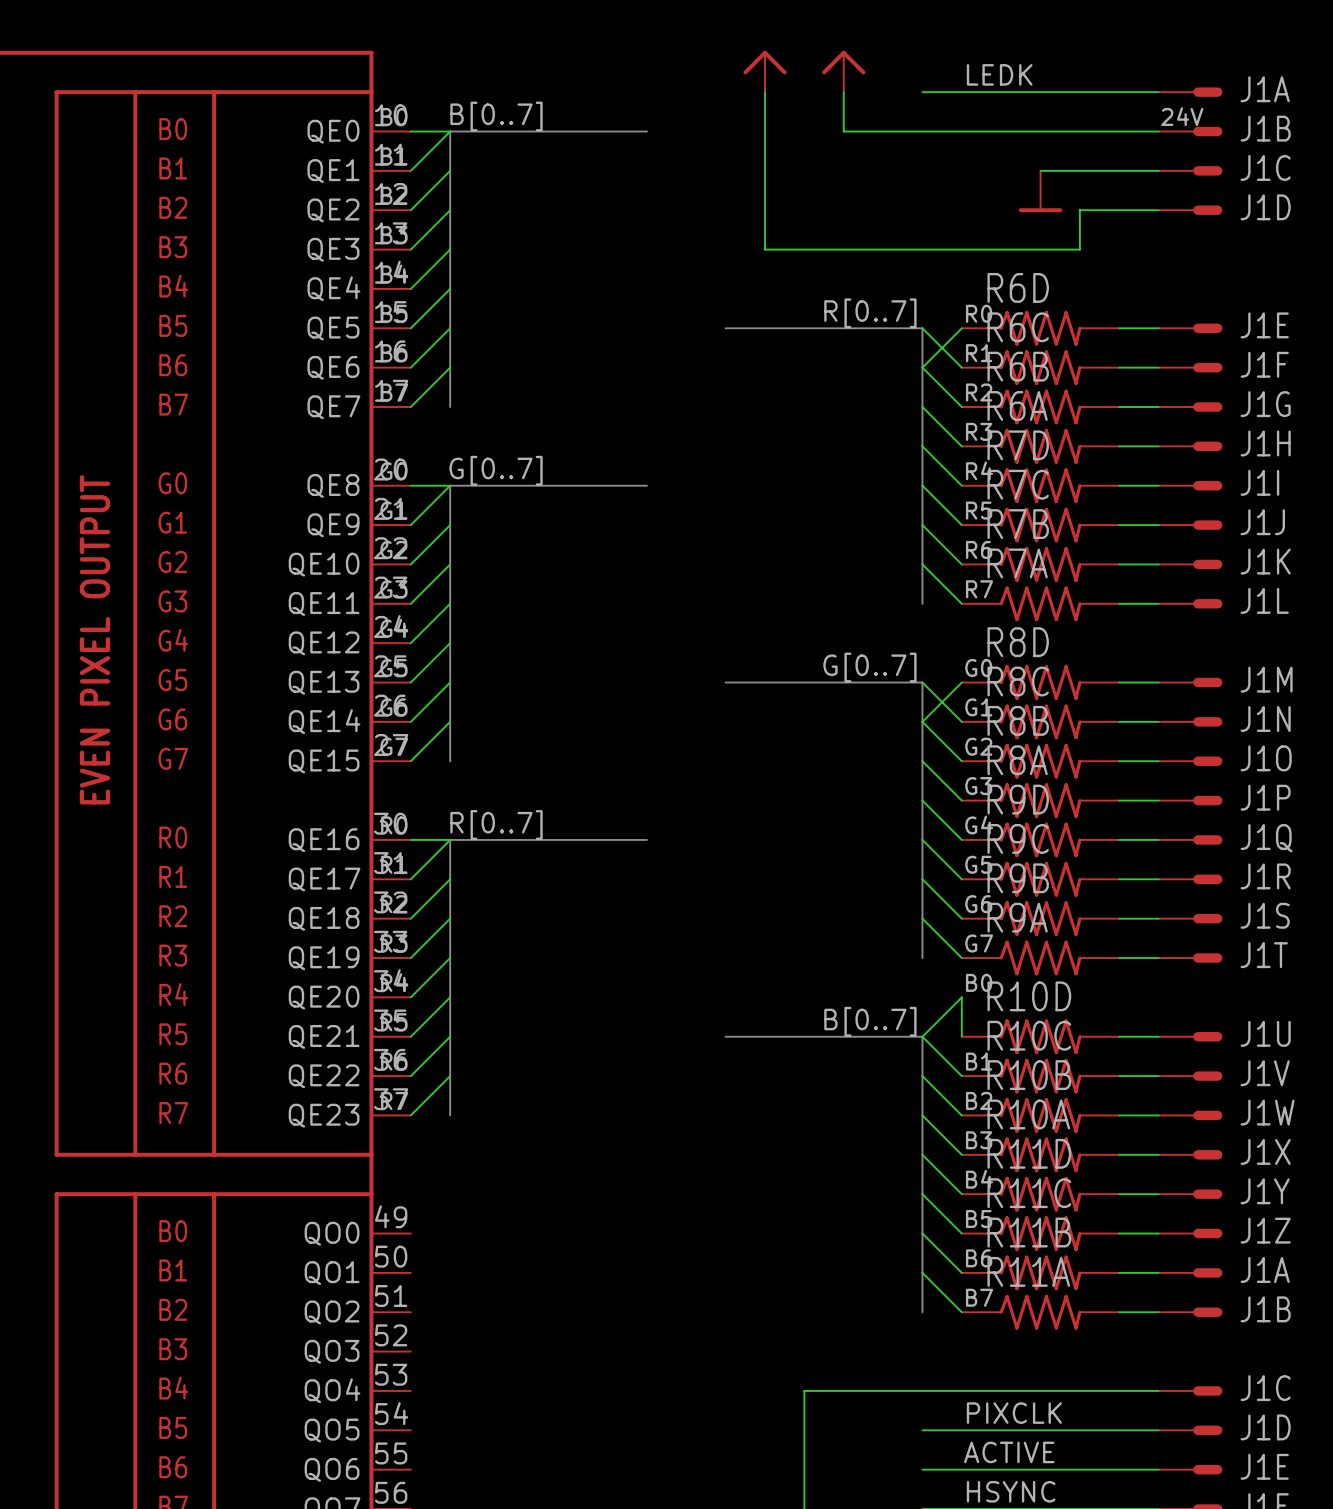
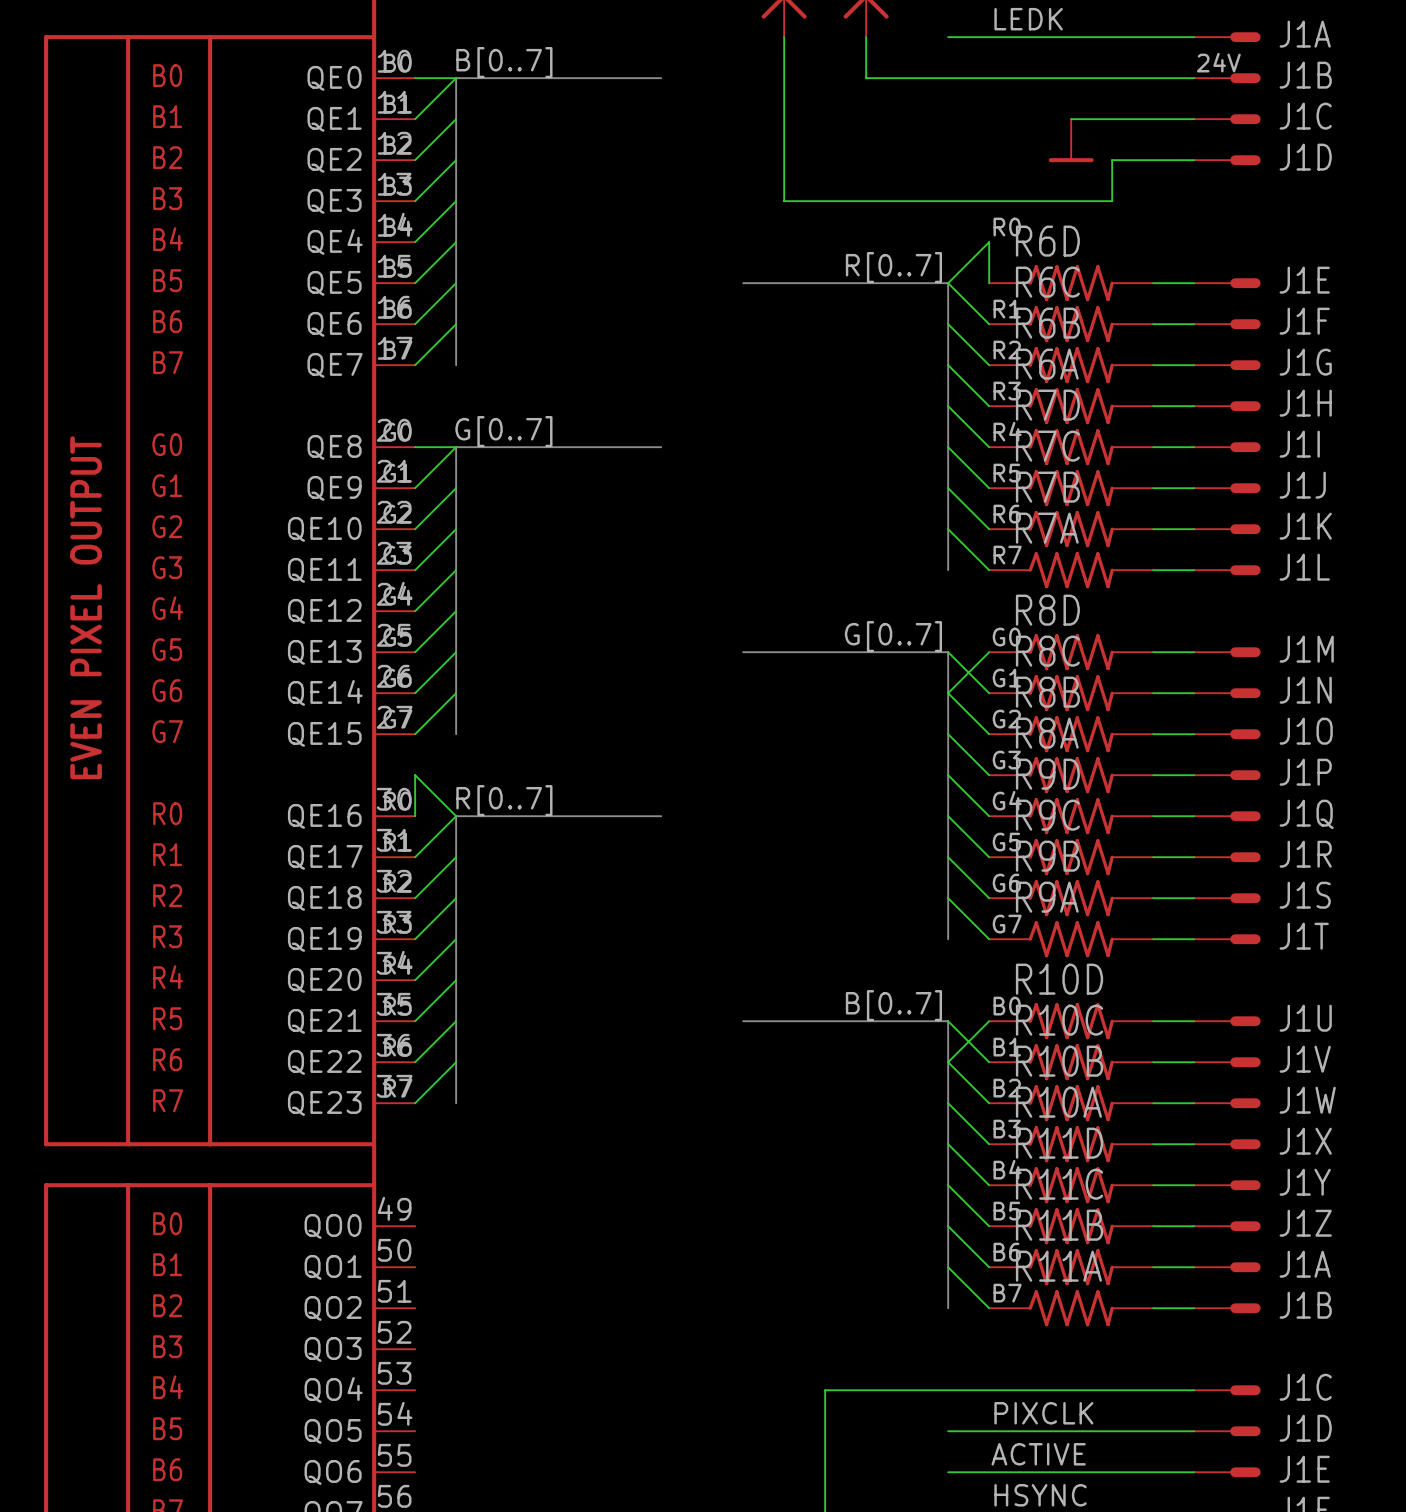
label position: R0 (979, 313) -> R0 (1007, 227)
wire: (961, 328) (922, 367) -> (989, 283) (989, 242) (948, 283)
wire: (410, 839) (450, 839) -> (415, 816) (415, 775) (456, 816)
label position: B0 (979, 982) -> B0 (1007, 1006)
wire: (922, 1036) (961, 997) (961, 1036) -> (948, 1062) (989, 1021)

